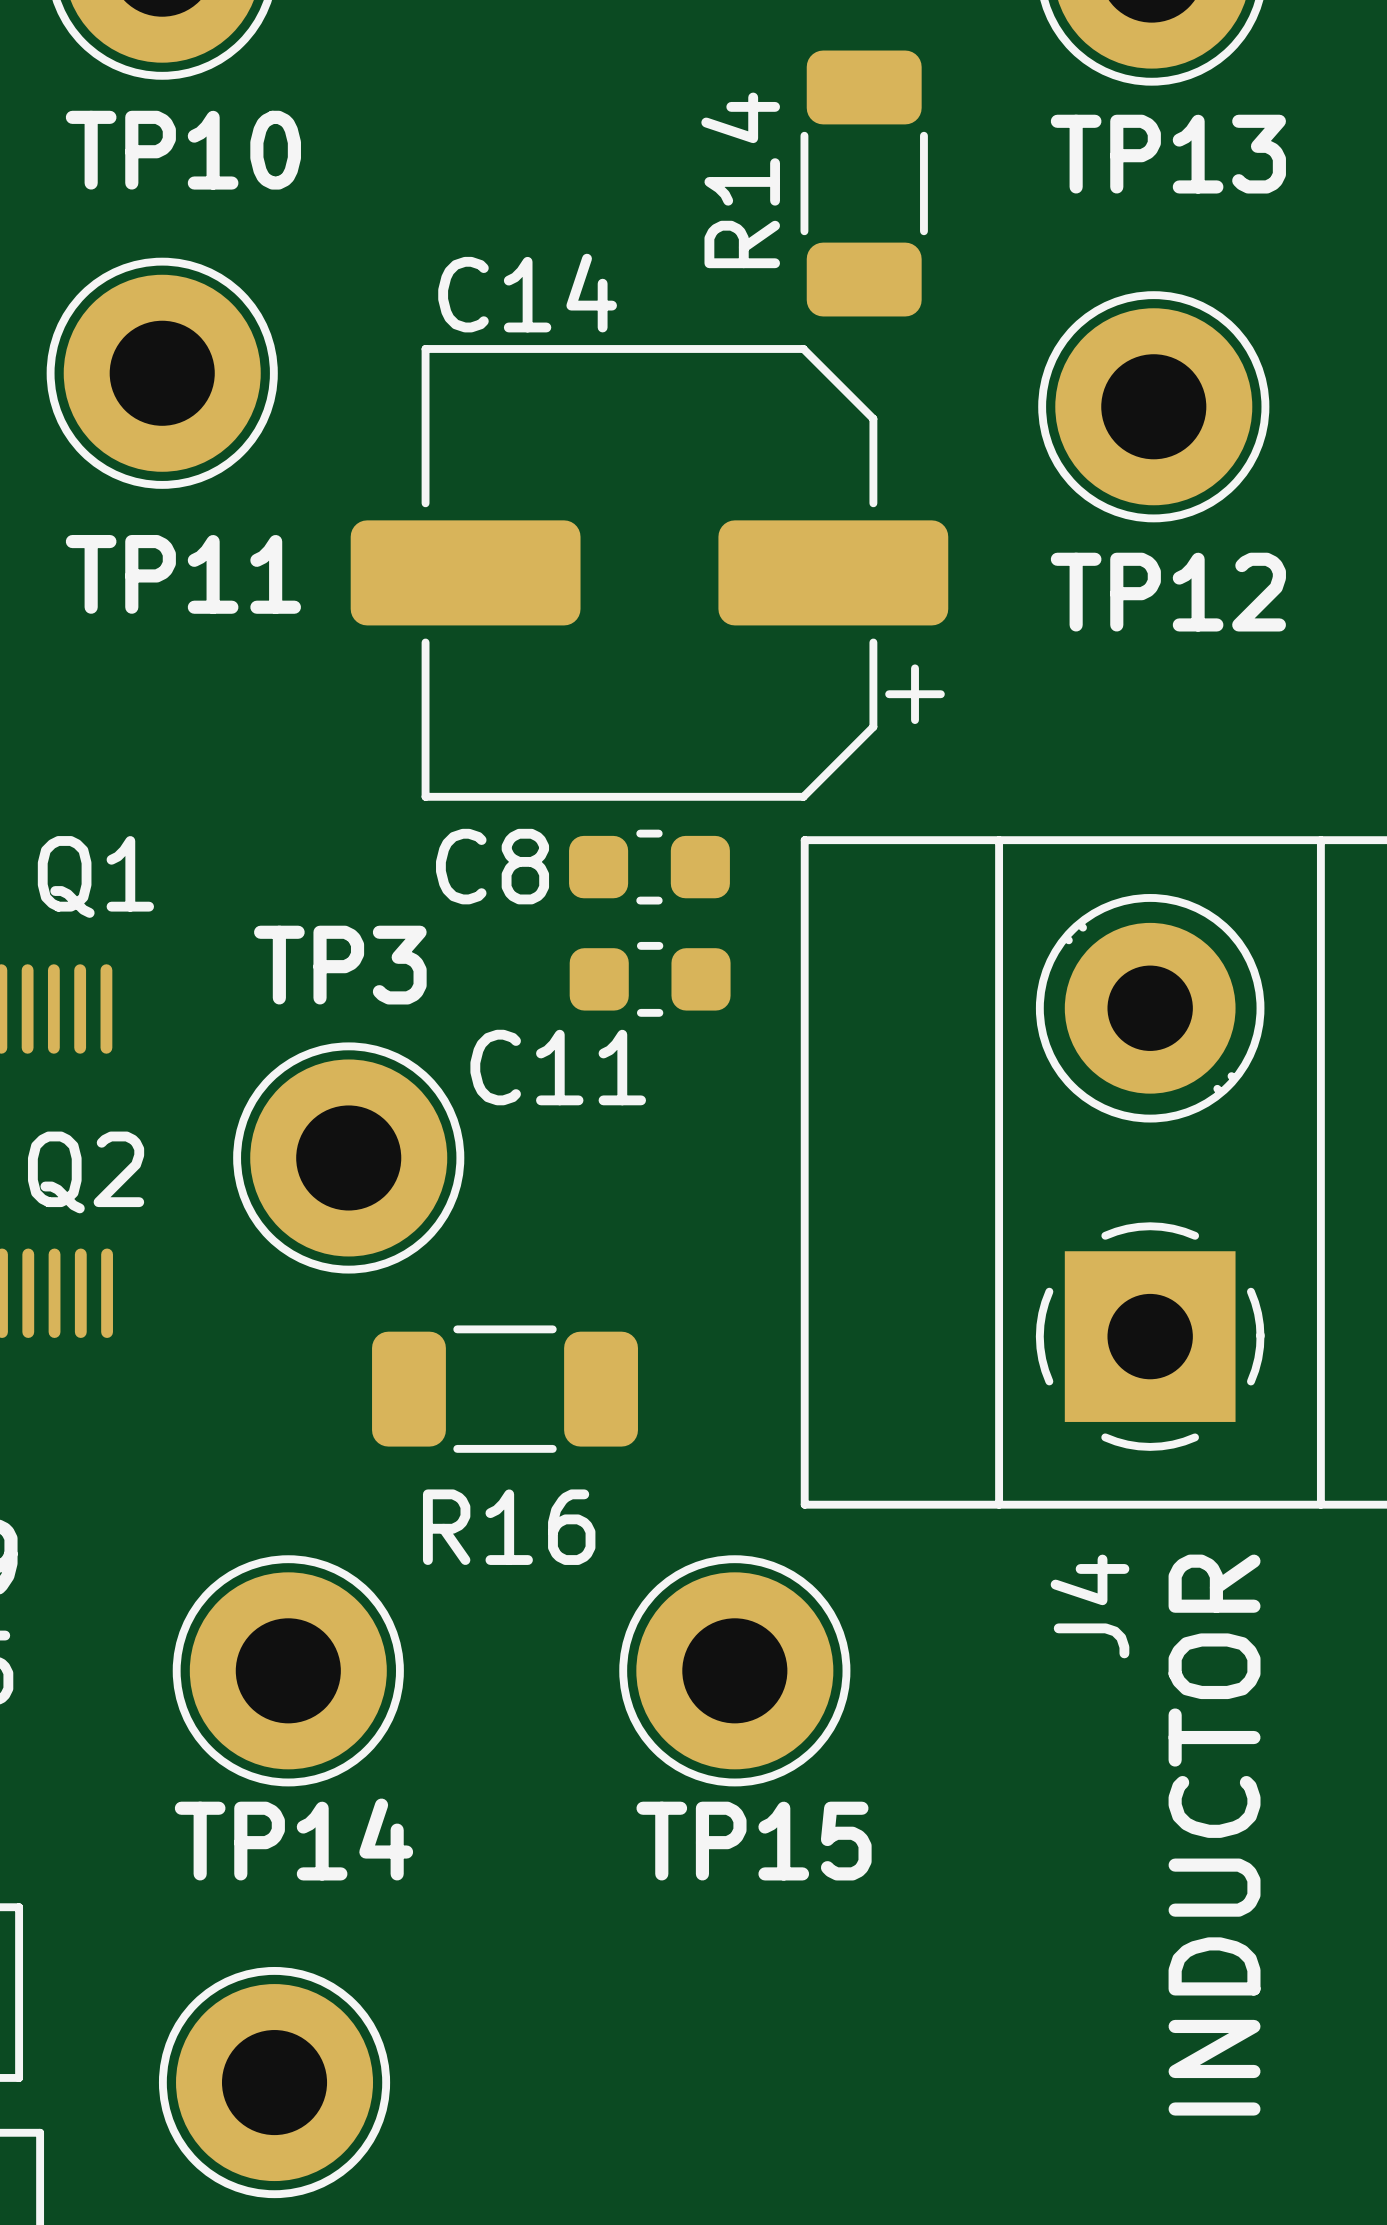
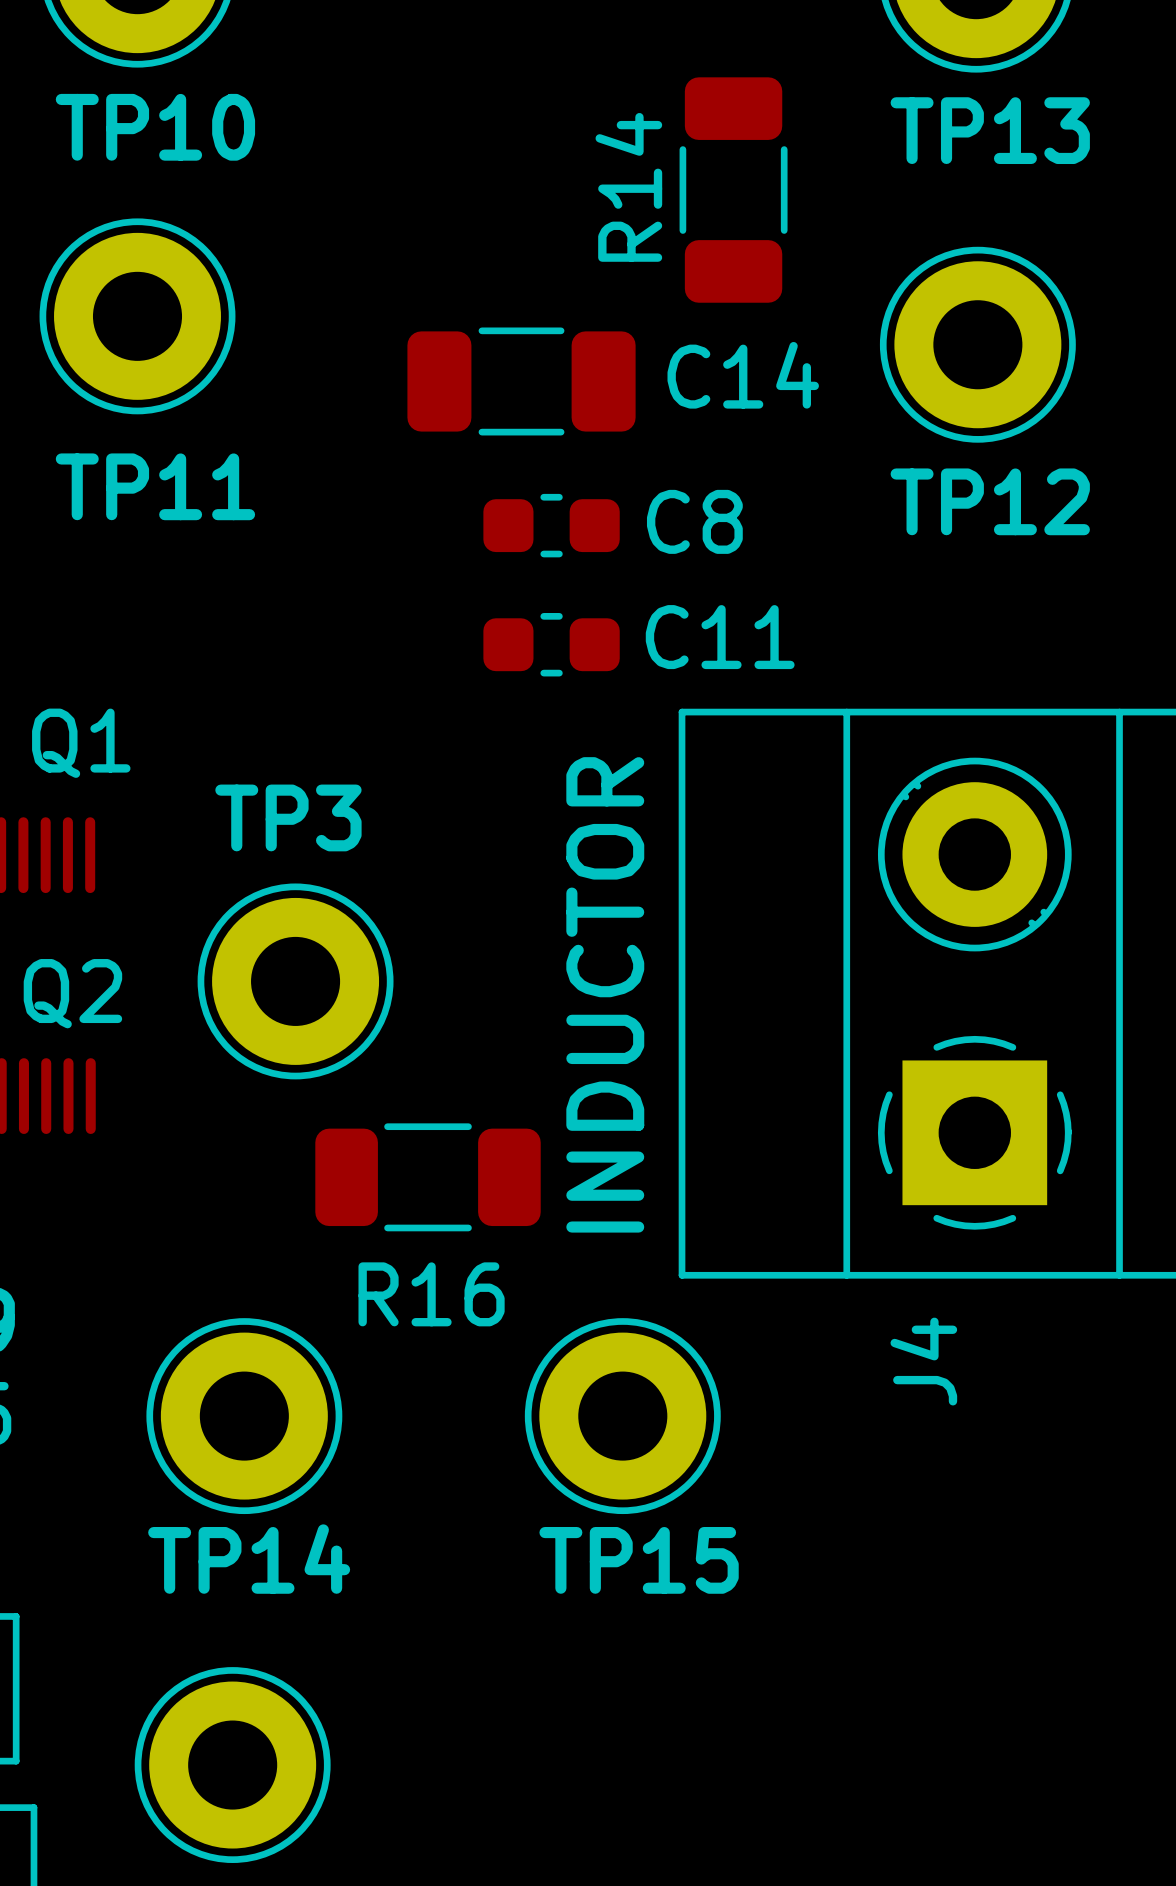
R14 position: (864, 183) -> (733, 190)
C14 name position: C14 (527, 293) -> C14 (743, 375)
C14 footprint: [350, 345, 949, 801] -> [407, 327, 636, 436]
C8 name position: C8 (492, 866) -> C8 (694, 521)
C8 position: (649, 867) -> (551, 525)
C11 position: (650, 979) -> (551, 644)
C11 name position: C11 (558, 1067) -> C11 (720, 637)
text position: INDUCTOR (1214, 1835) -> INDUCTOR (605, 994)

